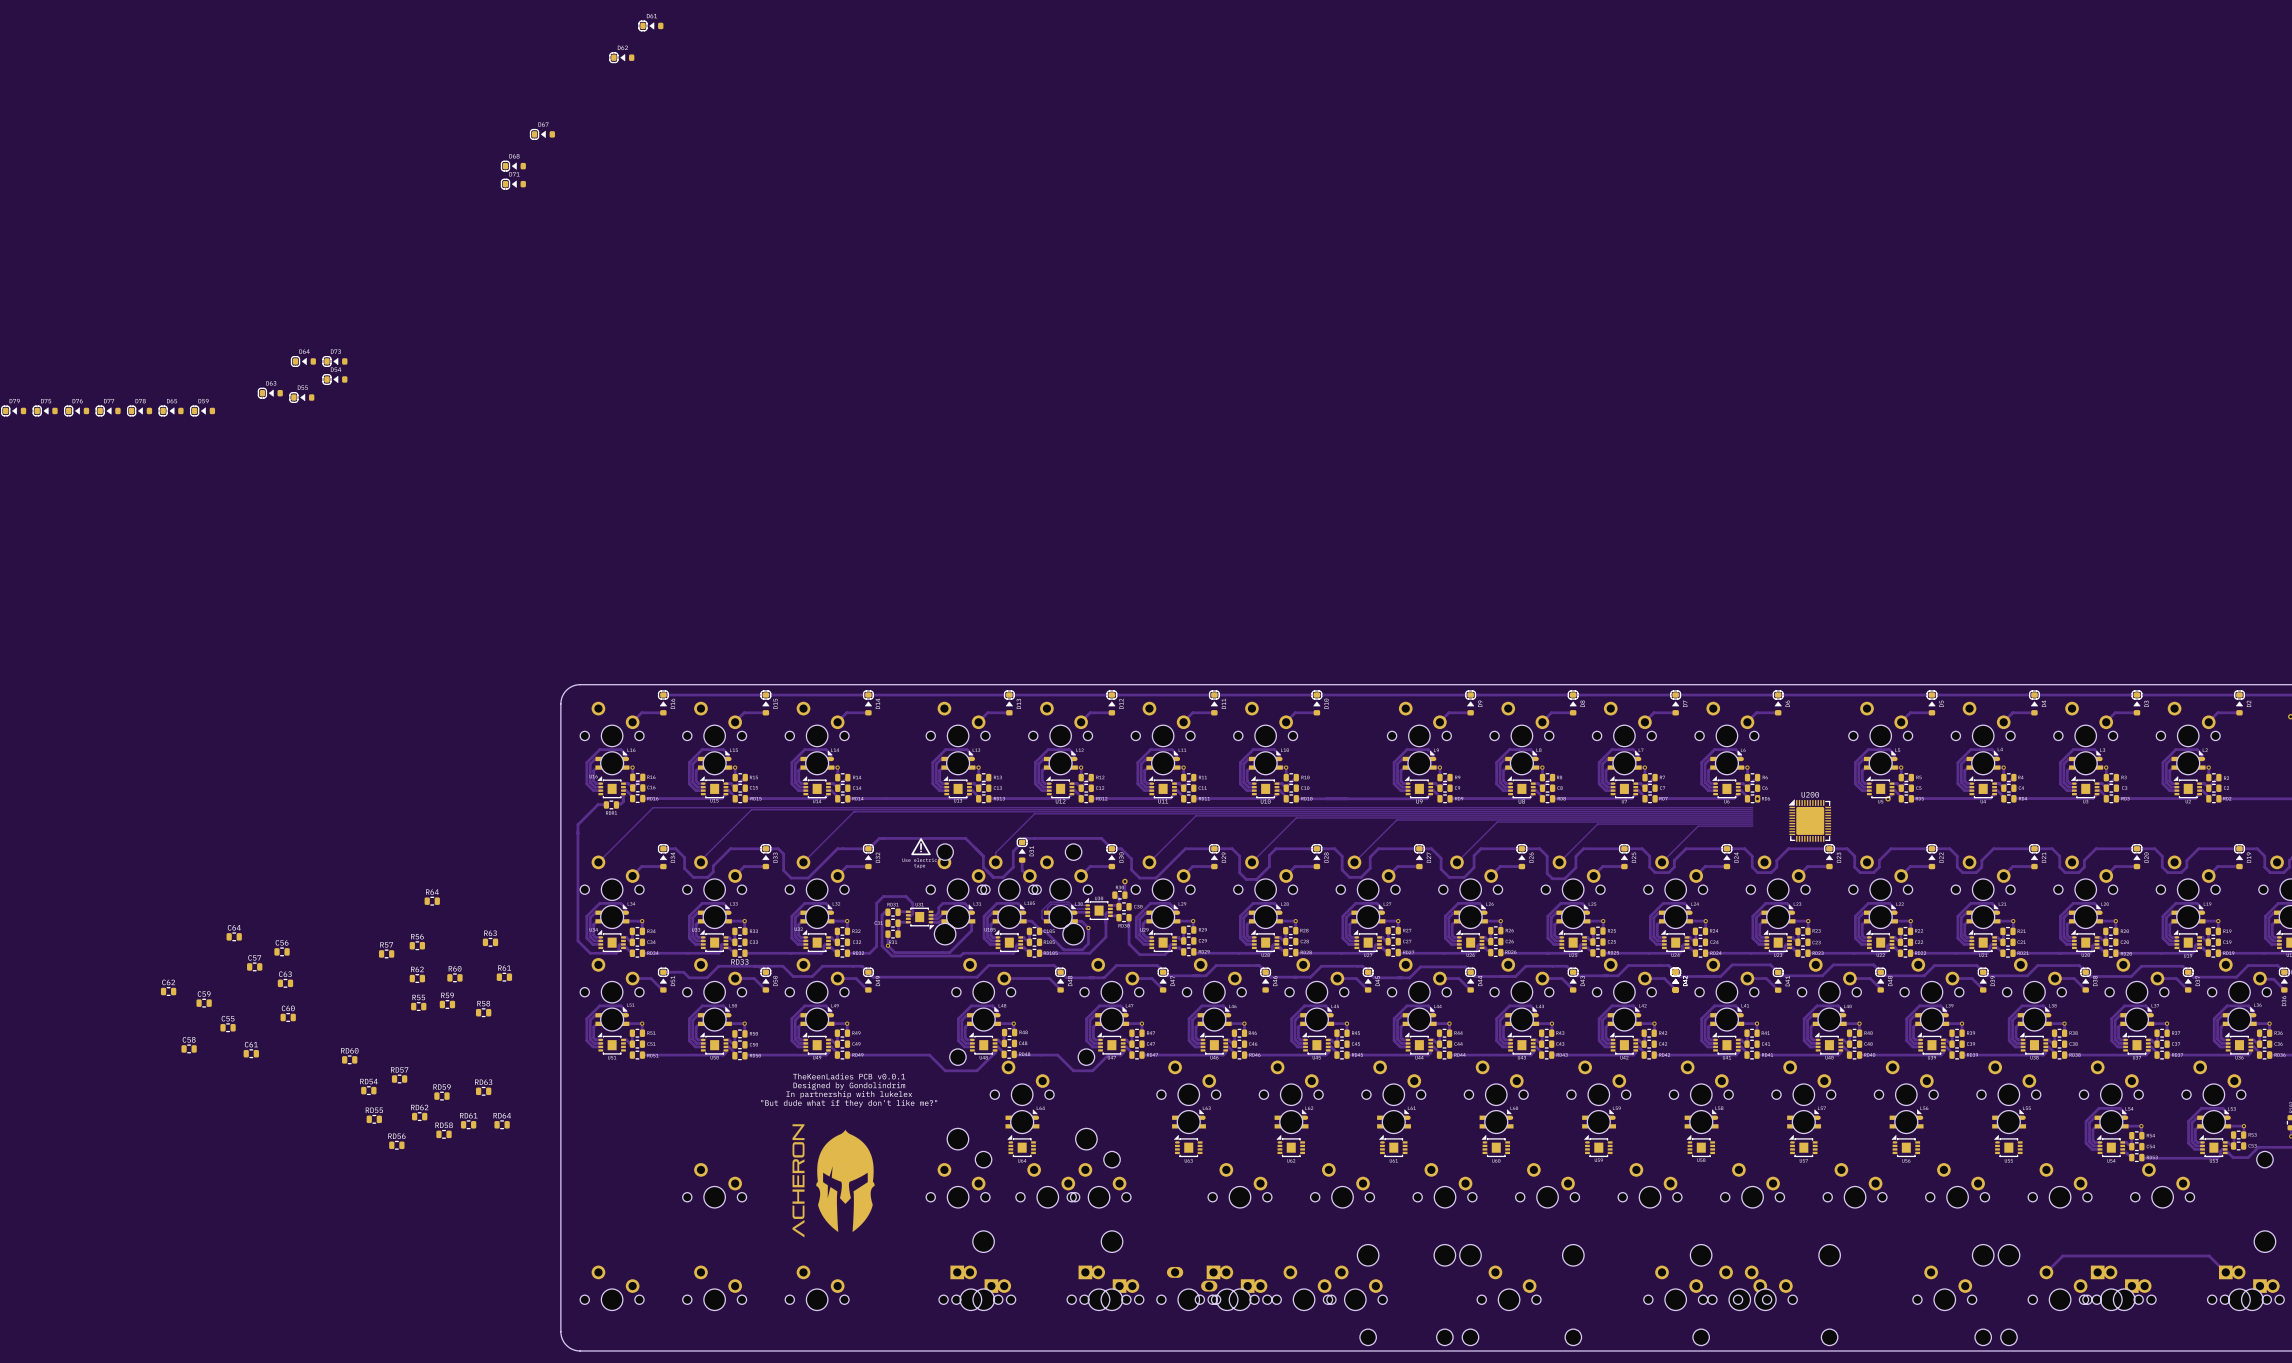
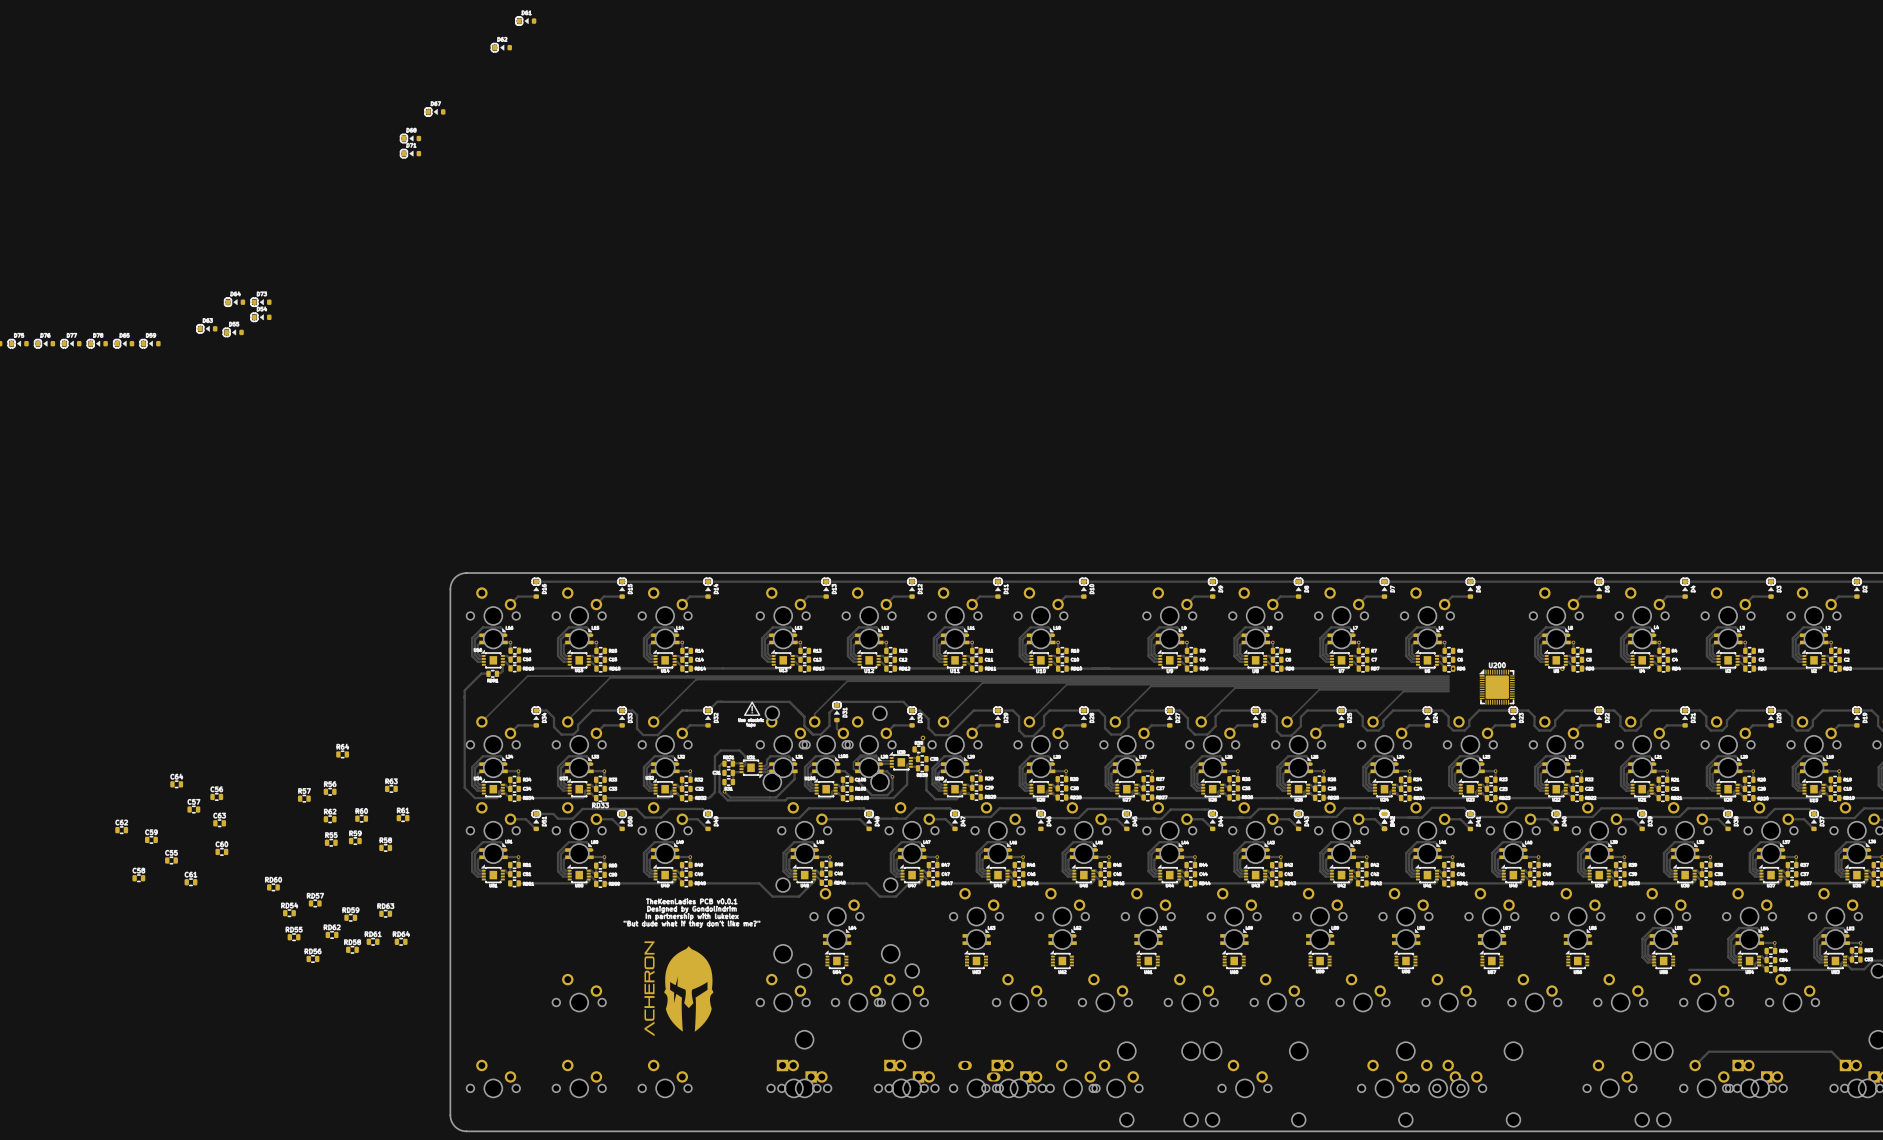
track: none -> (1652, 936) (1645, 940) (1645, 956) (1648, 959) (1654, 959)
track: none -> (1675, 936) (1675, 932) (1671, 928) (1653, 928) (1642, 938) (1642, 957) (1647, 962) (1654, 962)
track: none -> (1651, 942) (1648, 945) (1648, 954) (1654, 956)
track: none -> (1759, 962) (1755, 963) (1752, 969) (1689, 969)

